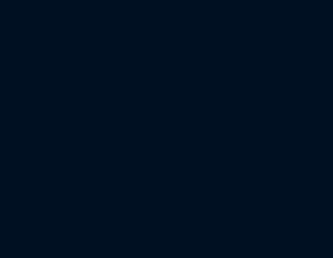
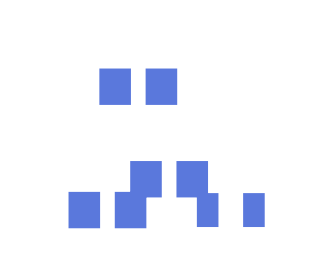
part: none -> (138, 86)
part: none -> (169, 179)
part: none -> (107, 210)
part: none -> (230, 210)

